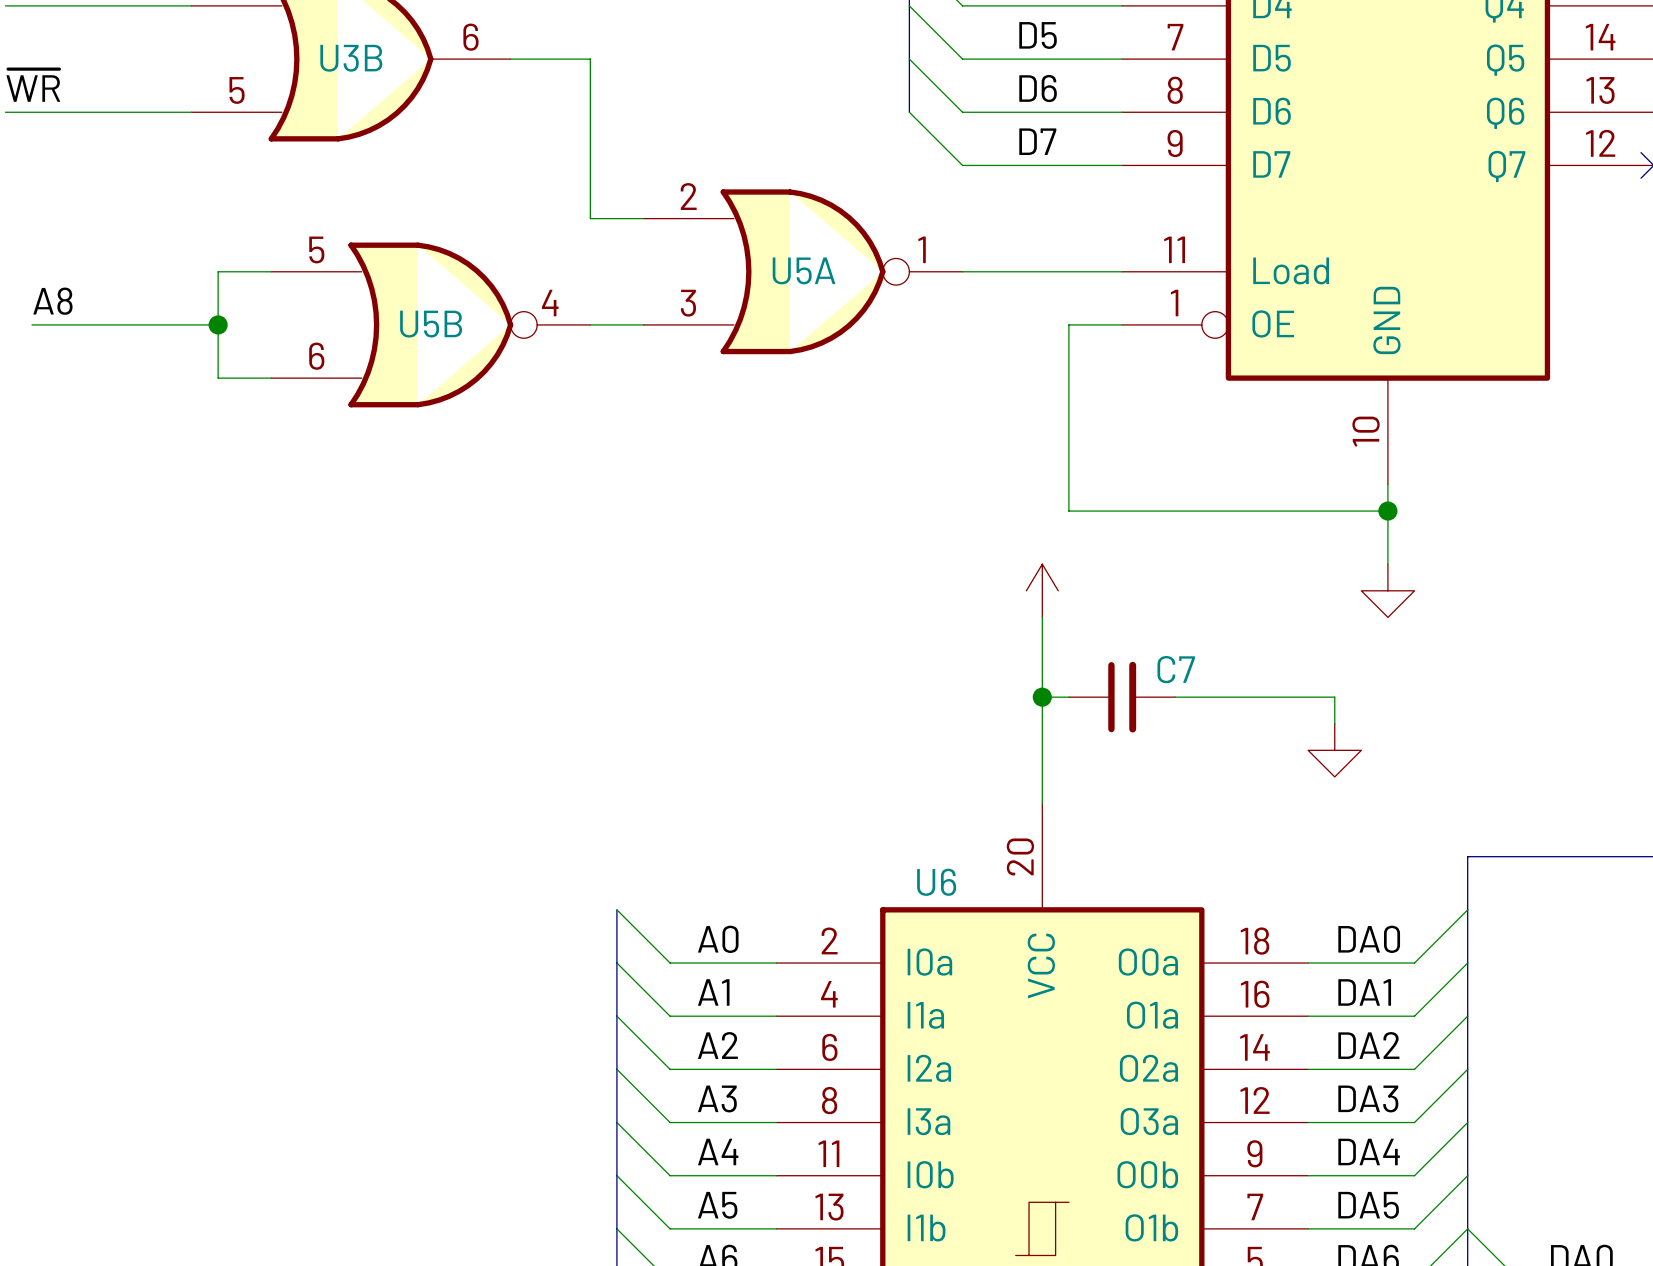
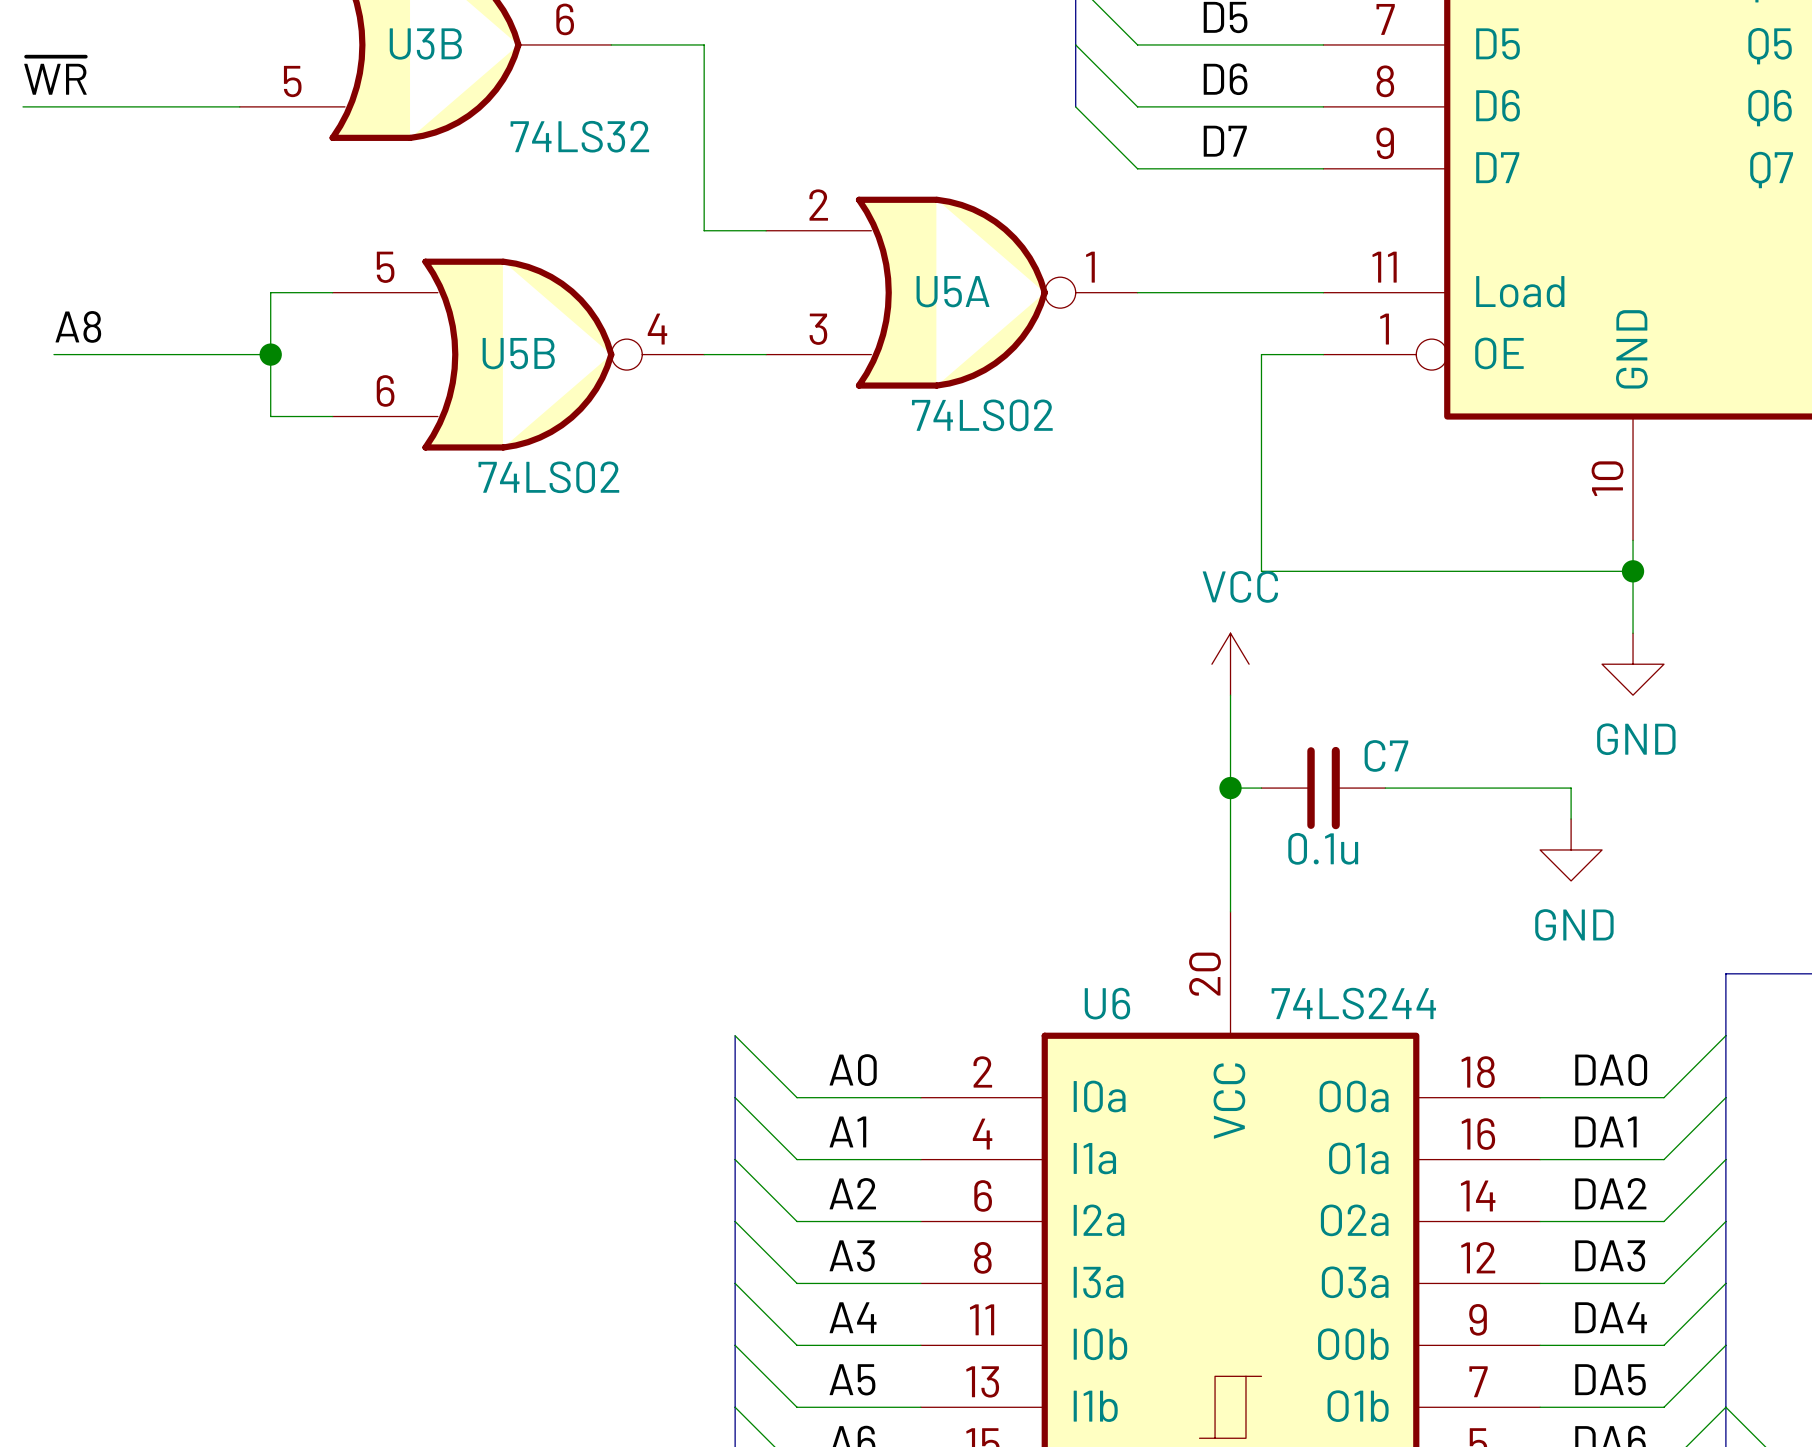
U3B value: none -> 74LS32 (579, 136)
U5A value: none -> 74LS02 (982, 415)
U5B value: none -> 74LS02 (548, 477)
power symbol text: none -> VCC (1240, 586)
power symbol text: none -> GND (1636, 739)
C7 value: none -> 0.1u (1323, 848)
power symbol text: none -> GND (1574, 924)
U6 value: none -> 74LS244 (1353, 1003)

